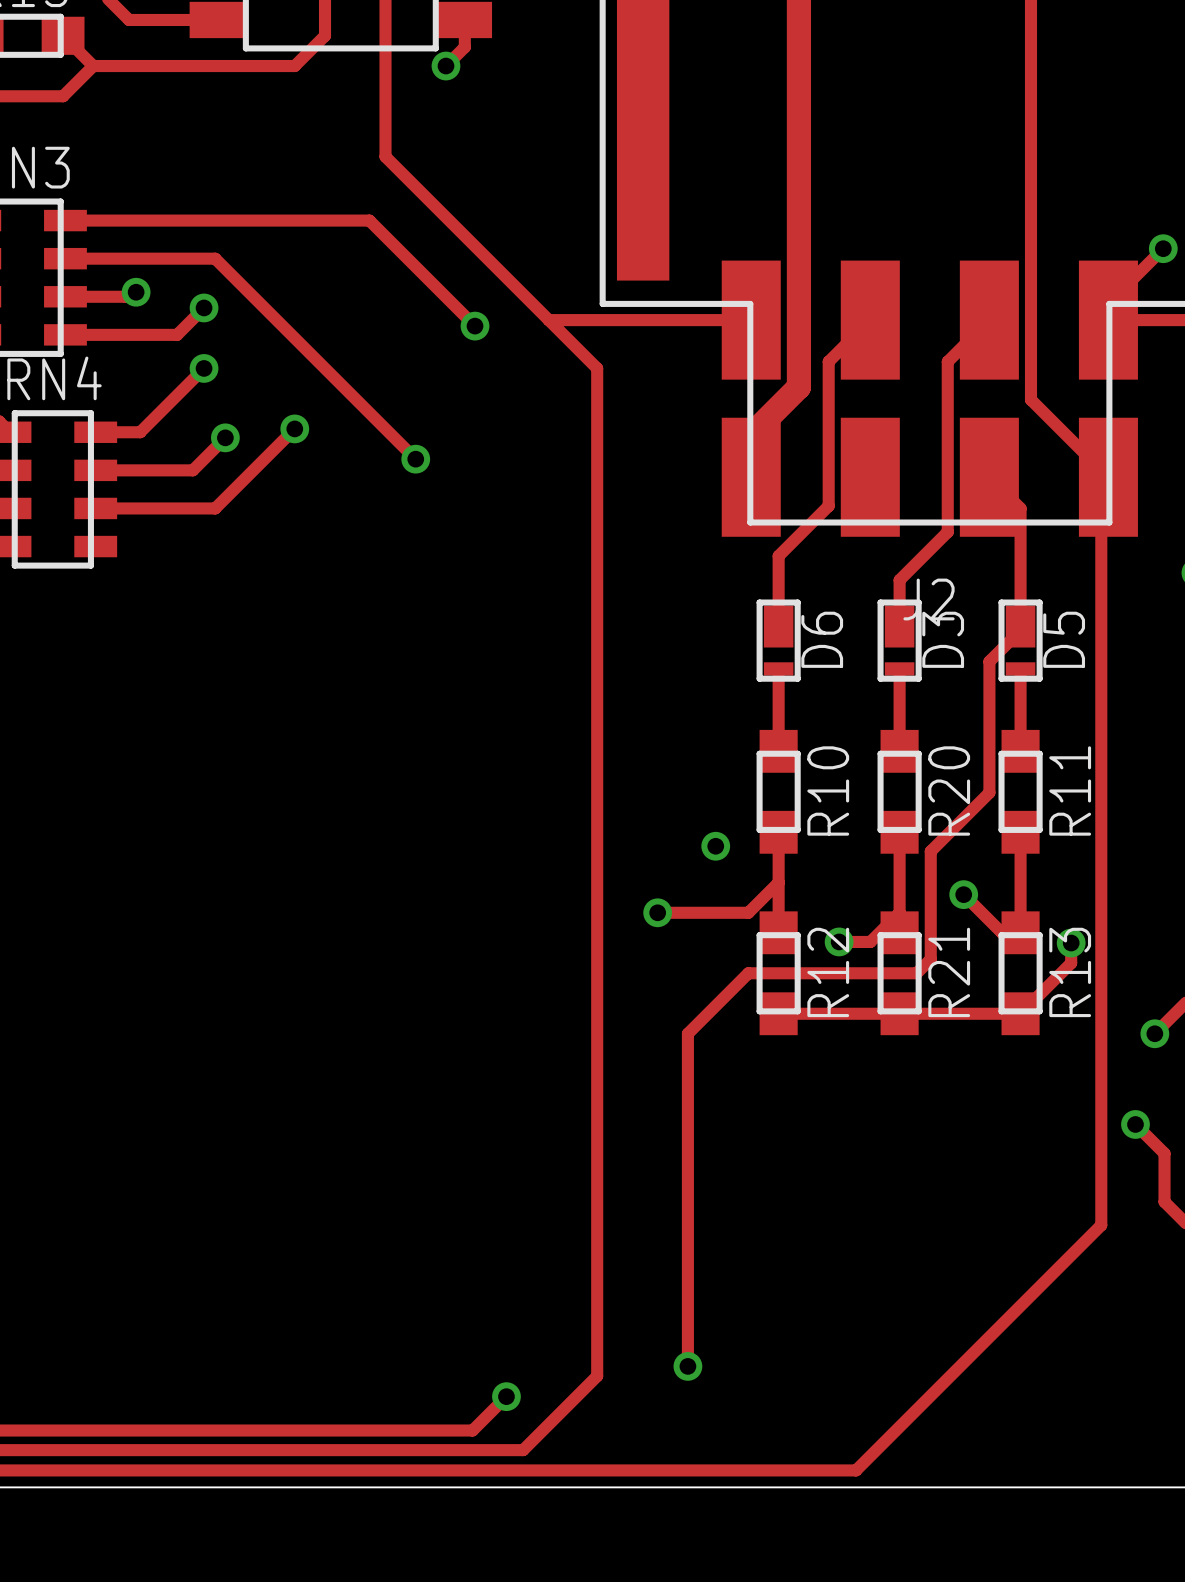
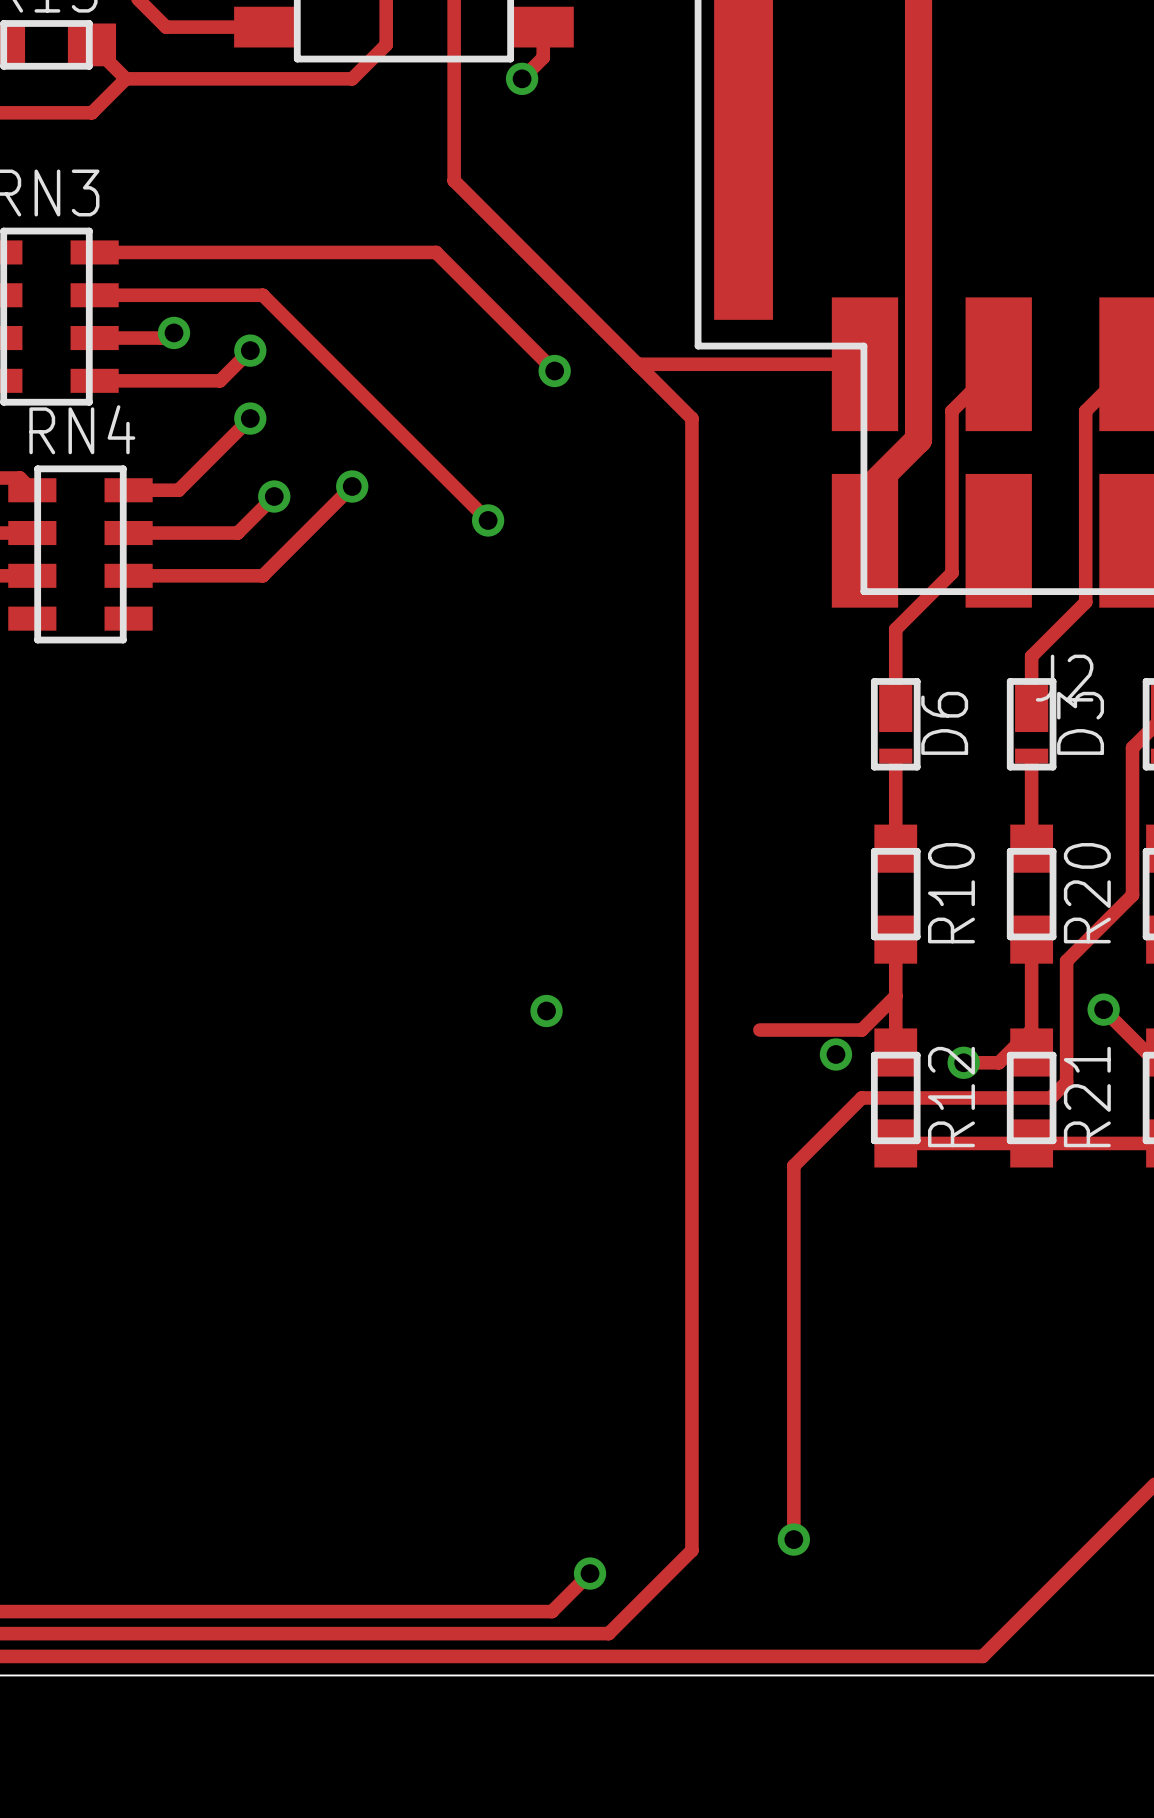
via: (715, 846) -> none
via: none -> (546, 1011)
via: (657, 912) -> none
via: none -> (835, 1054)

